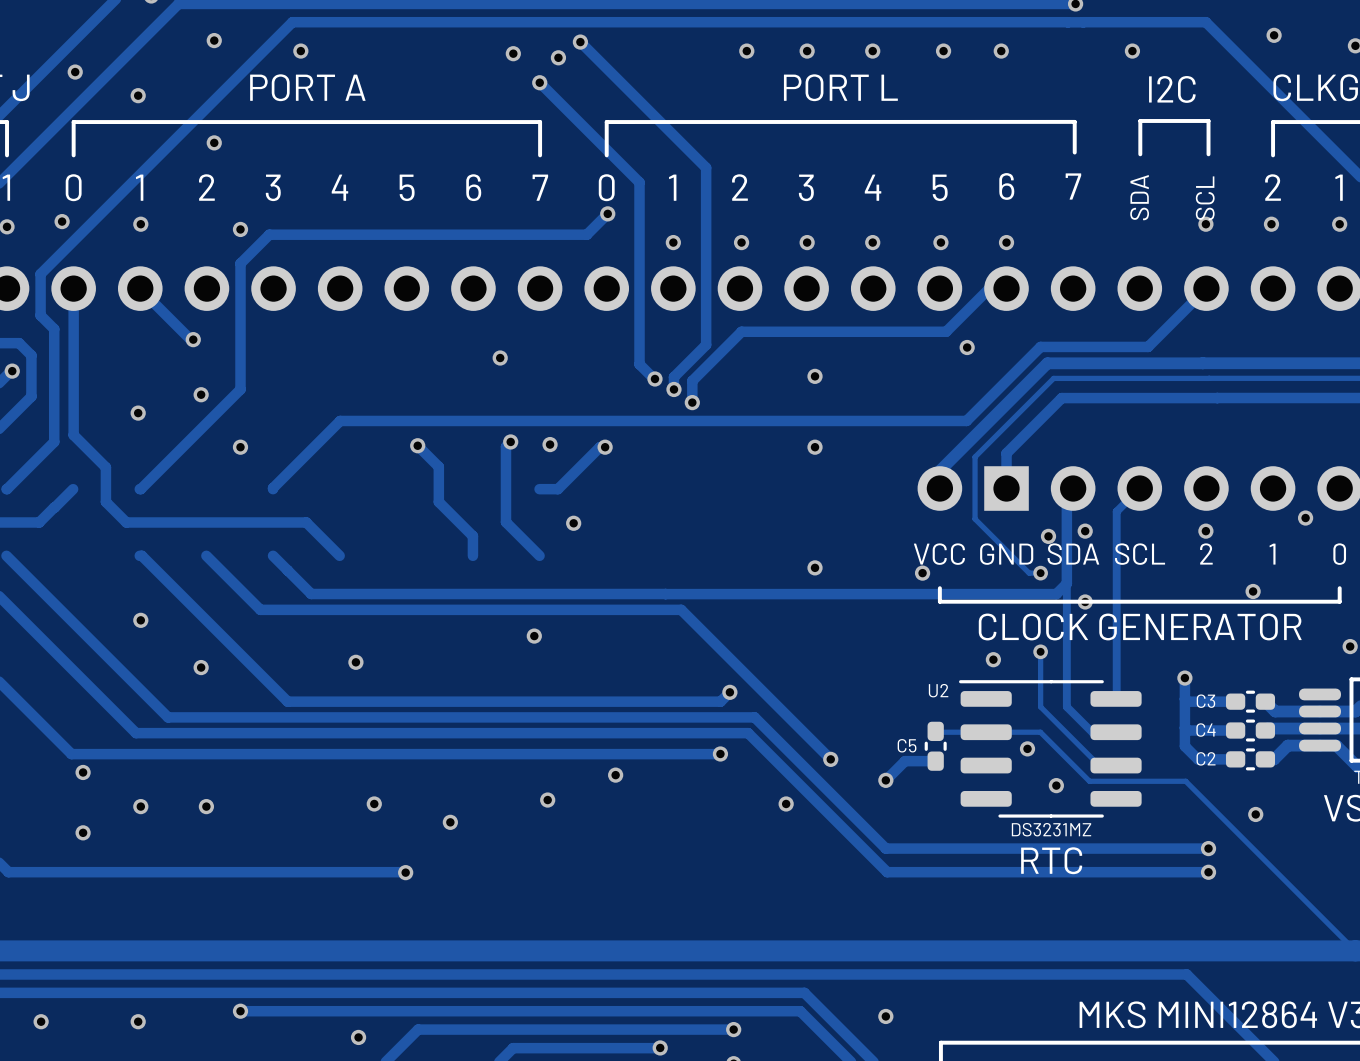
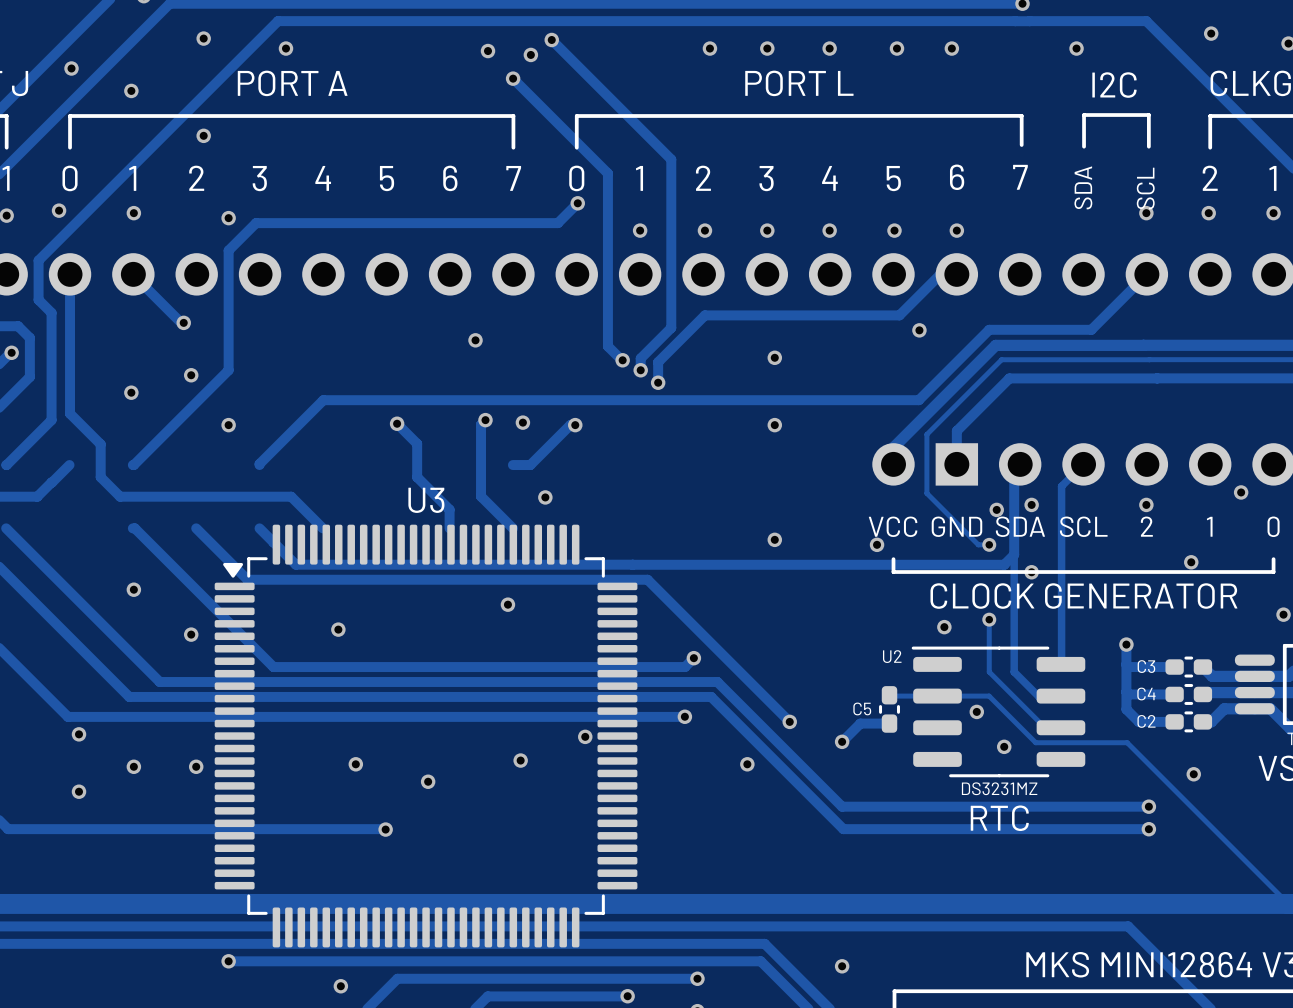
U3: none -> (426, 736)
via: (41, 1021) -> none
via: (138, 1021) -> none

